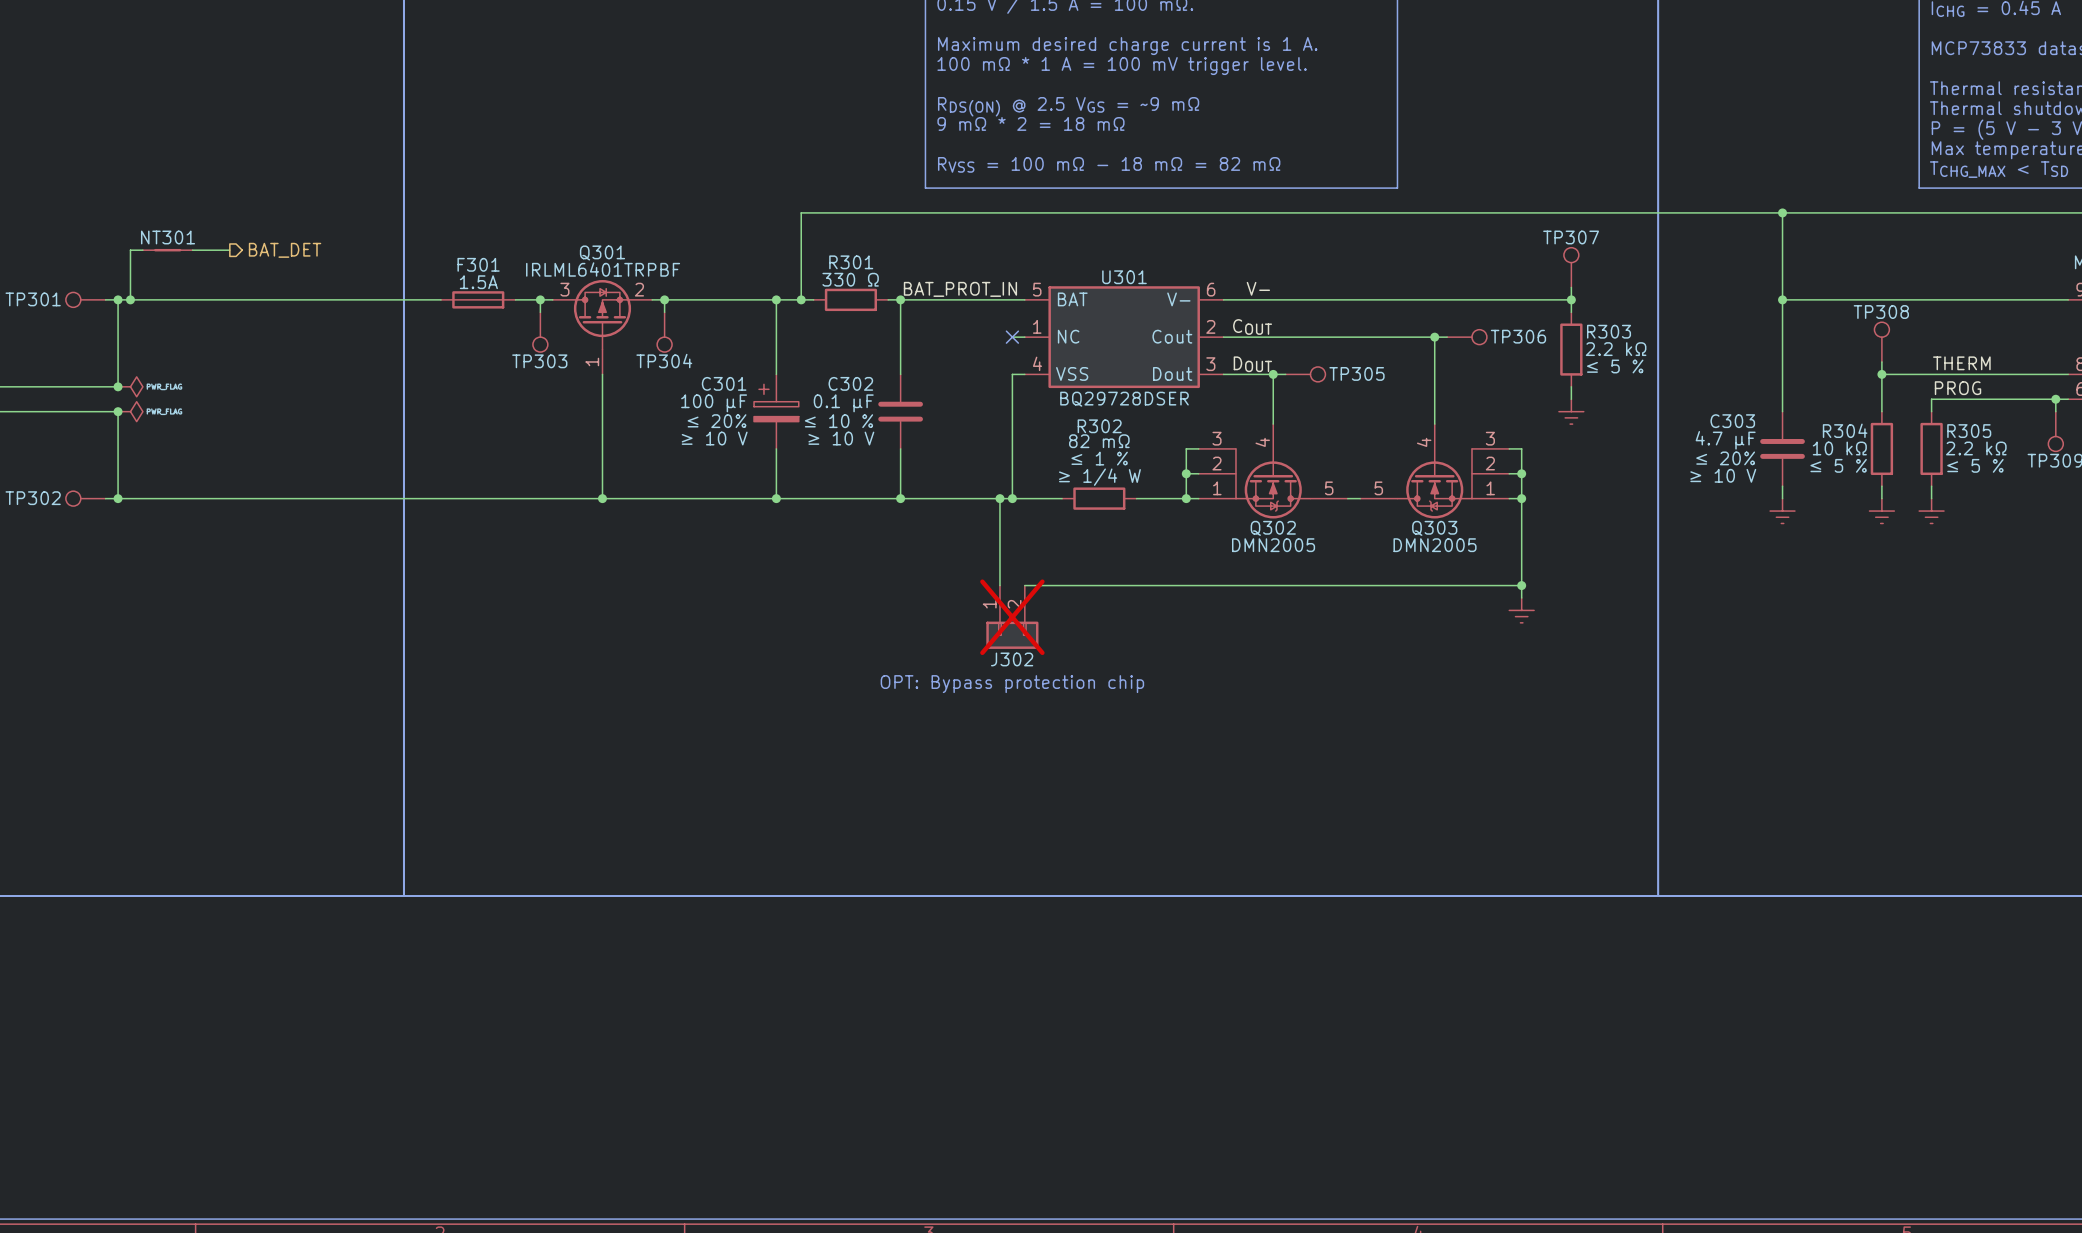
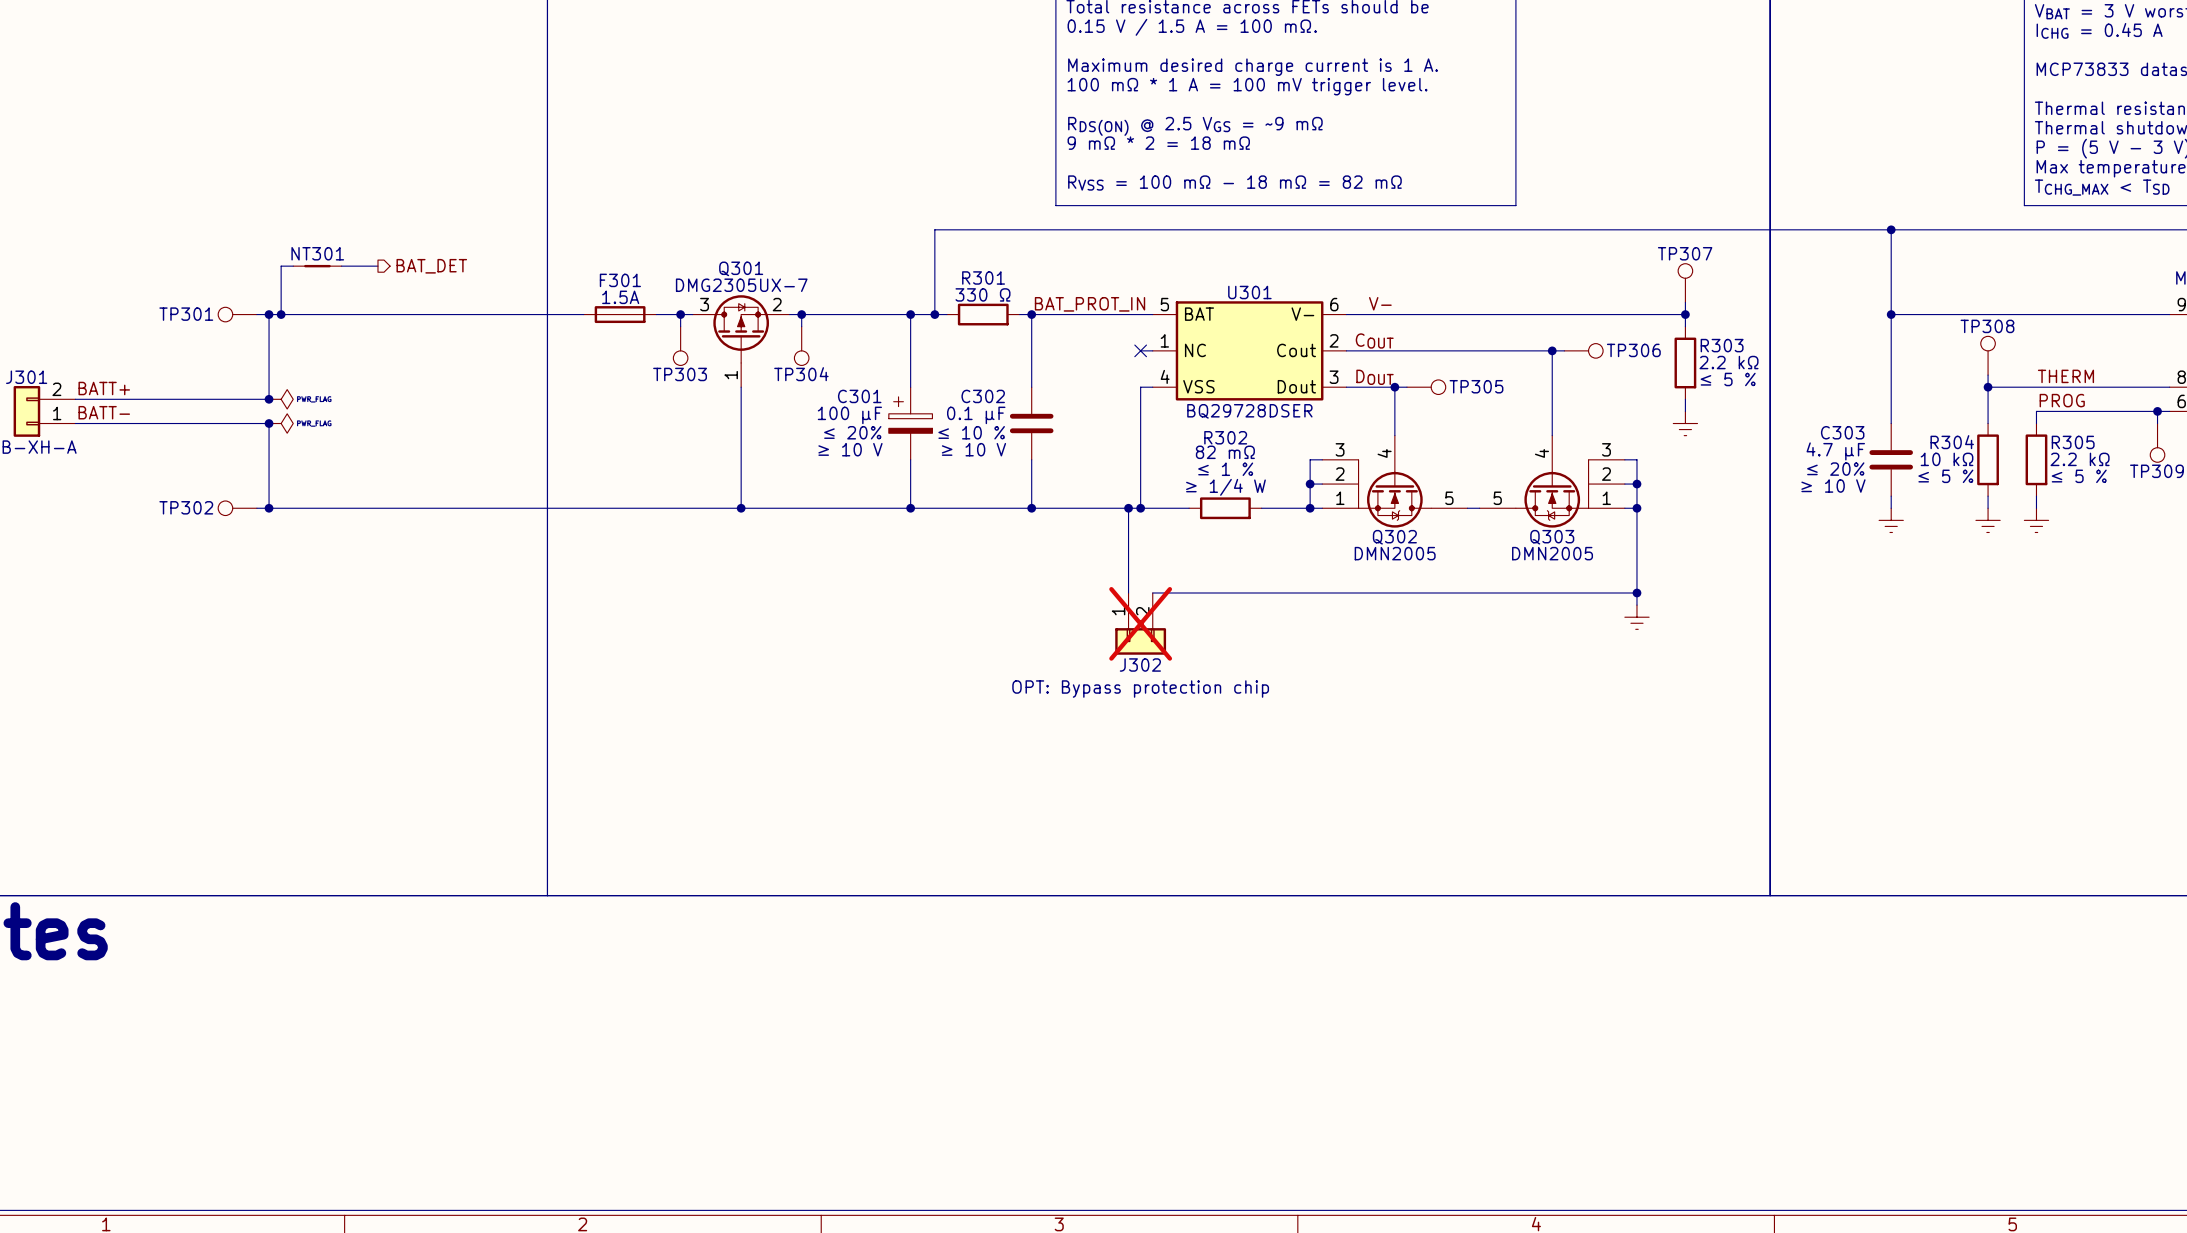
Q301 value: IRLML6401TRPBF (603, 269) -> DMG2305UX-7 (741, 285)

